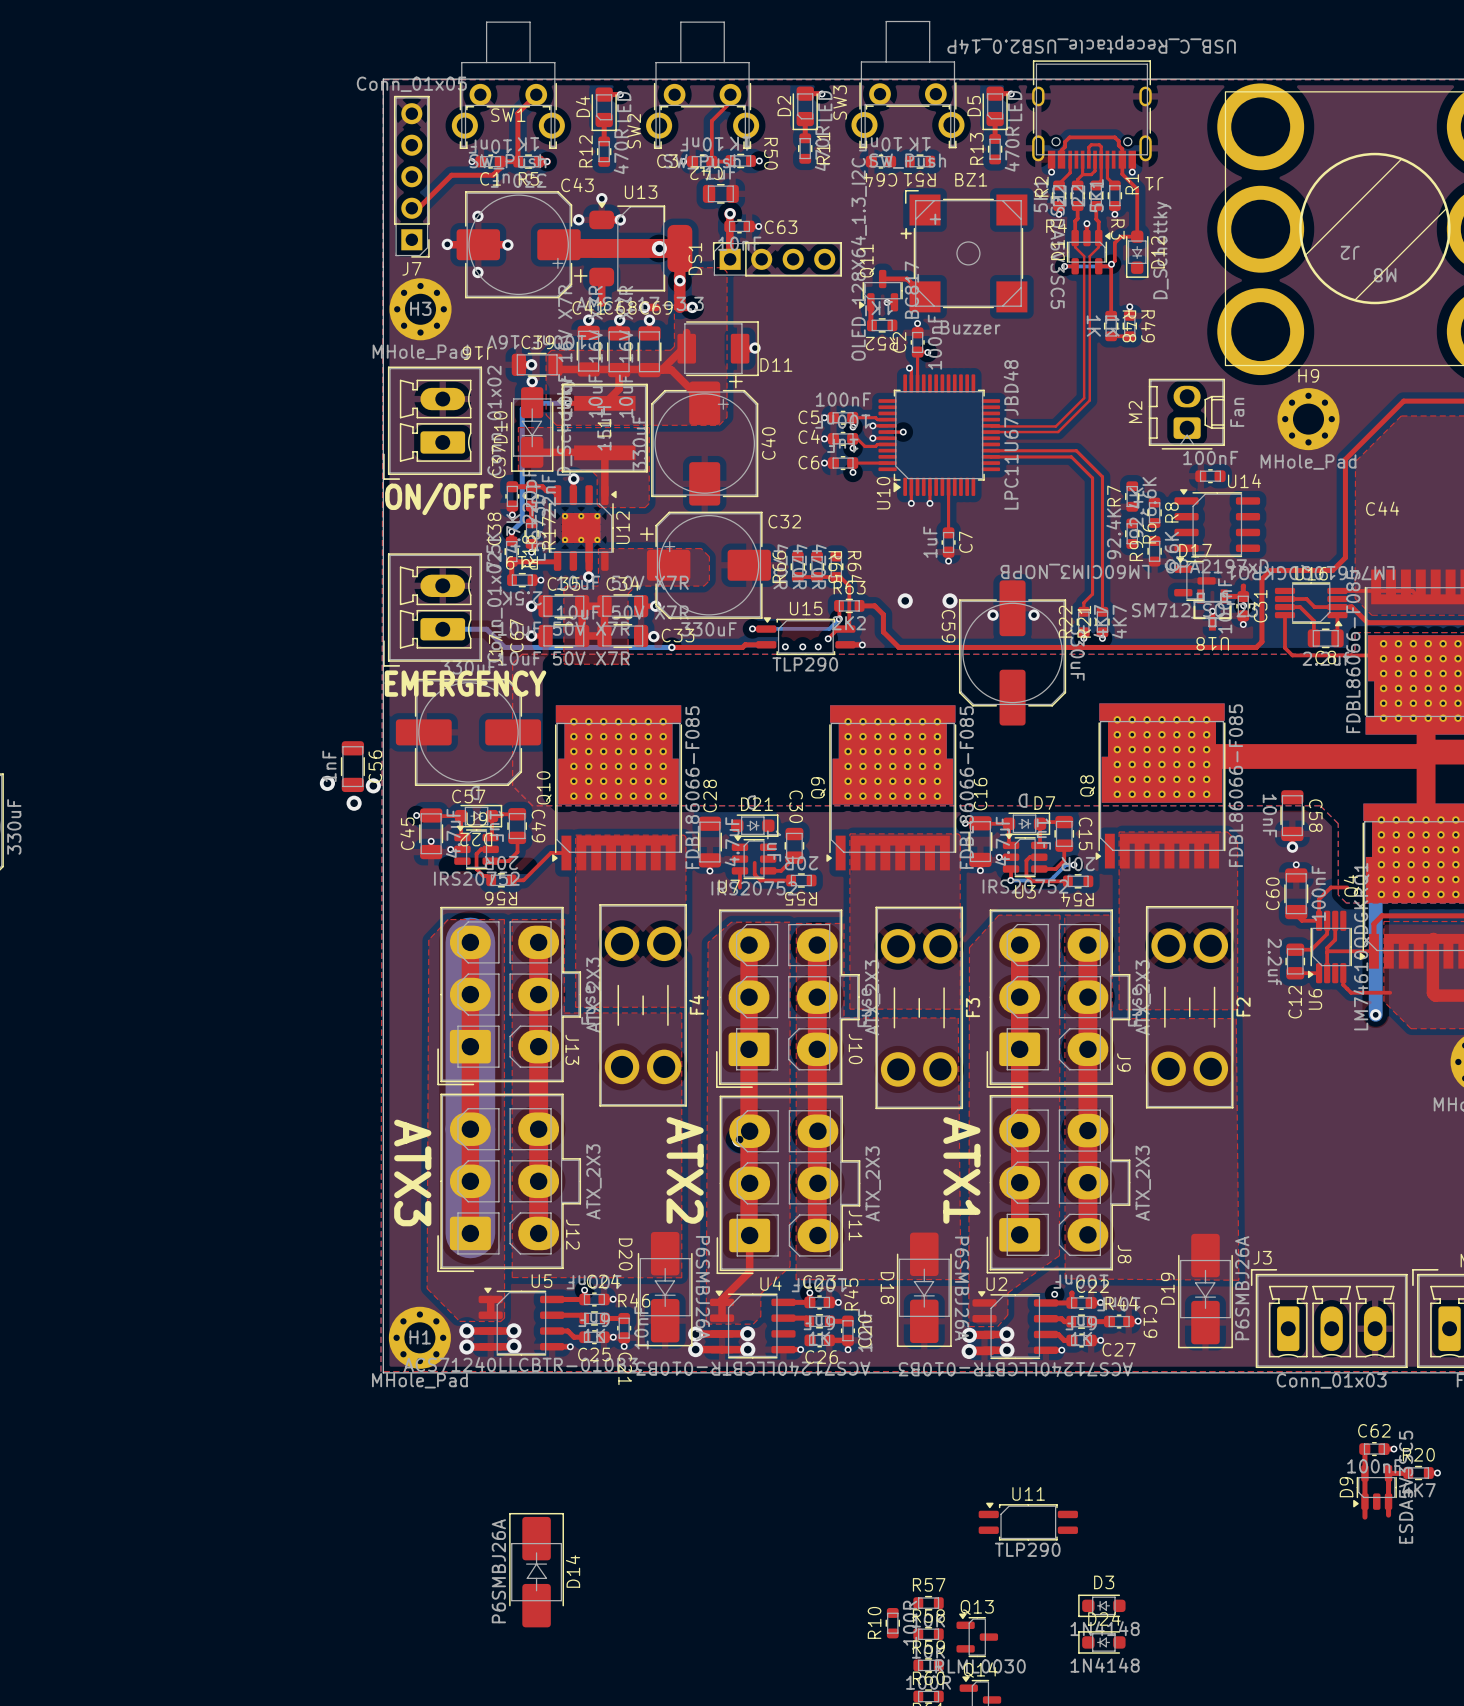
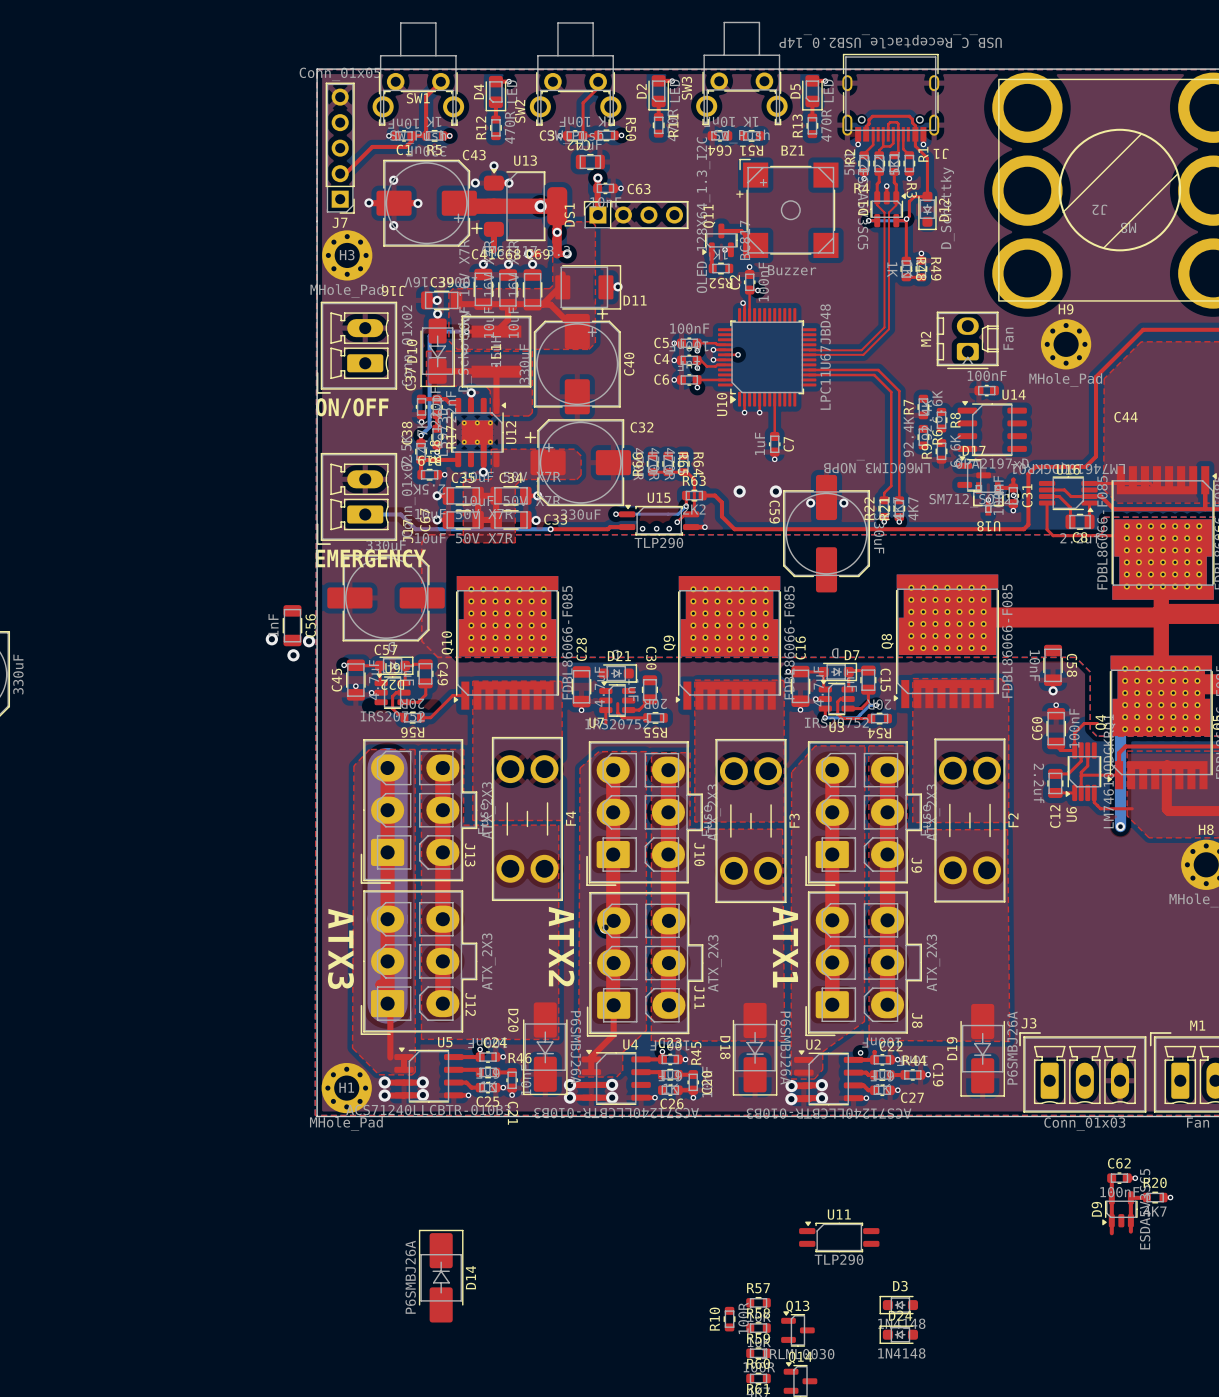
top track: none -> (380, 984) (380, 984)
top track: none -> (390, 1006) (390, 1057)

